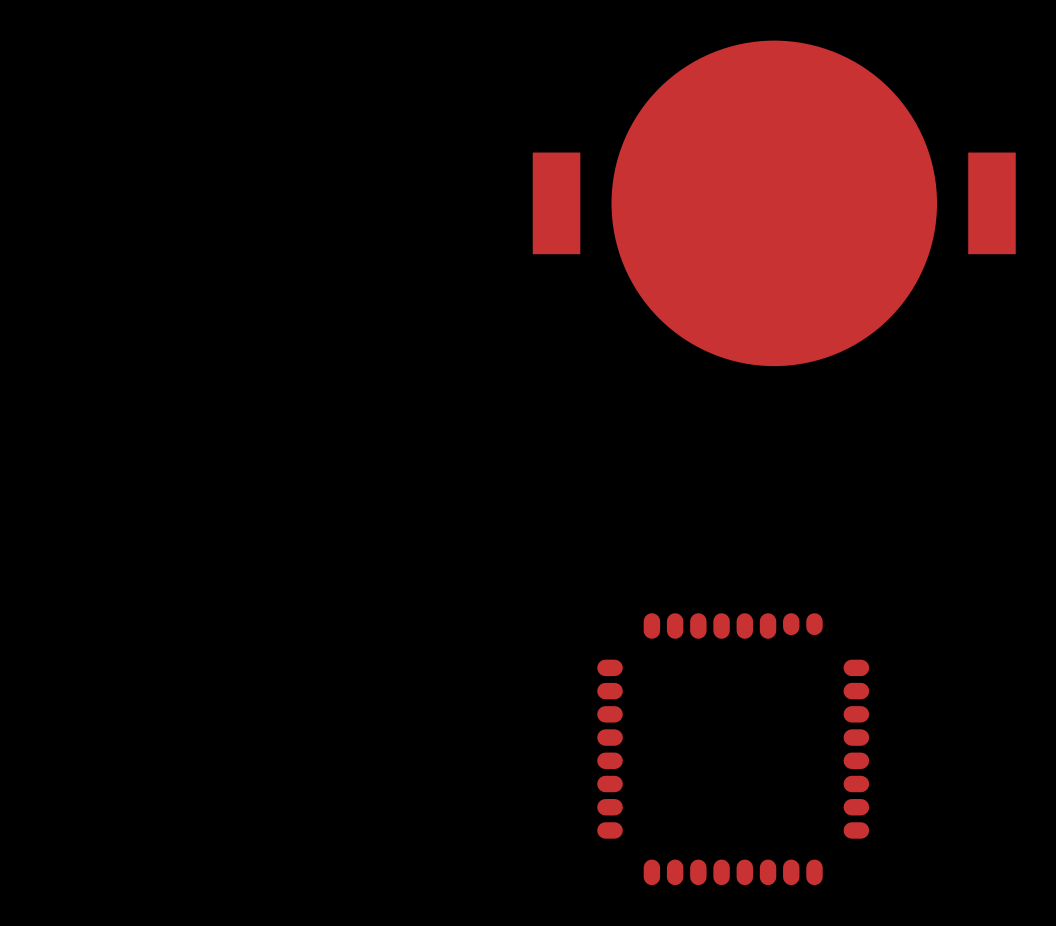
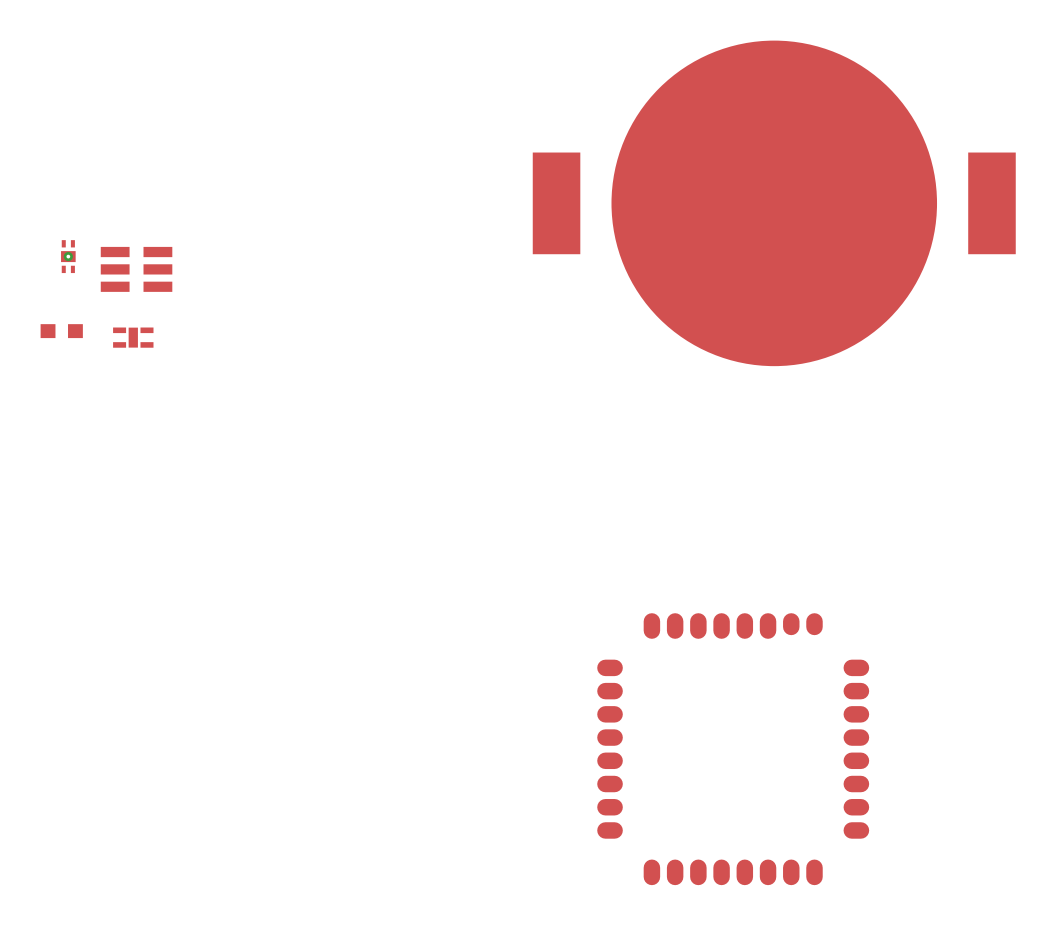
part: none -> (68, 256)
part: none -> (136, 269)
part: none -> (61, 331)
part: none -> (133, 337)

